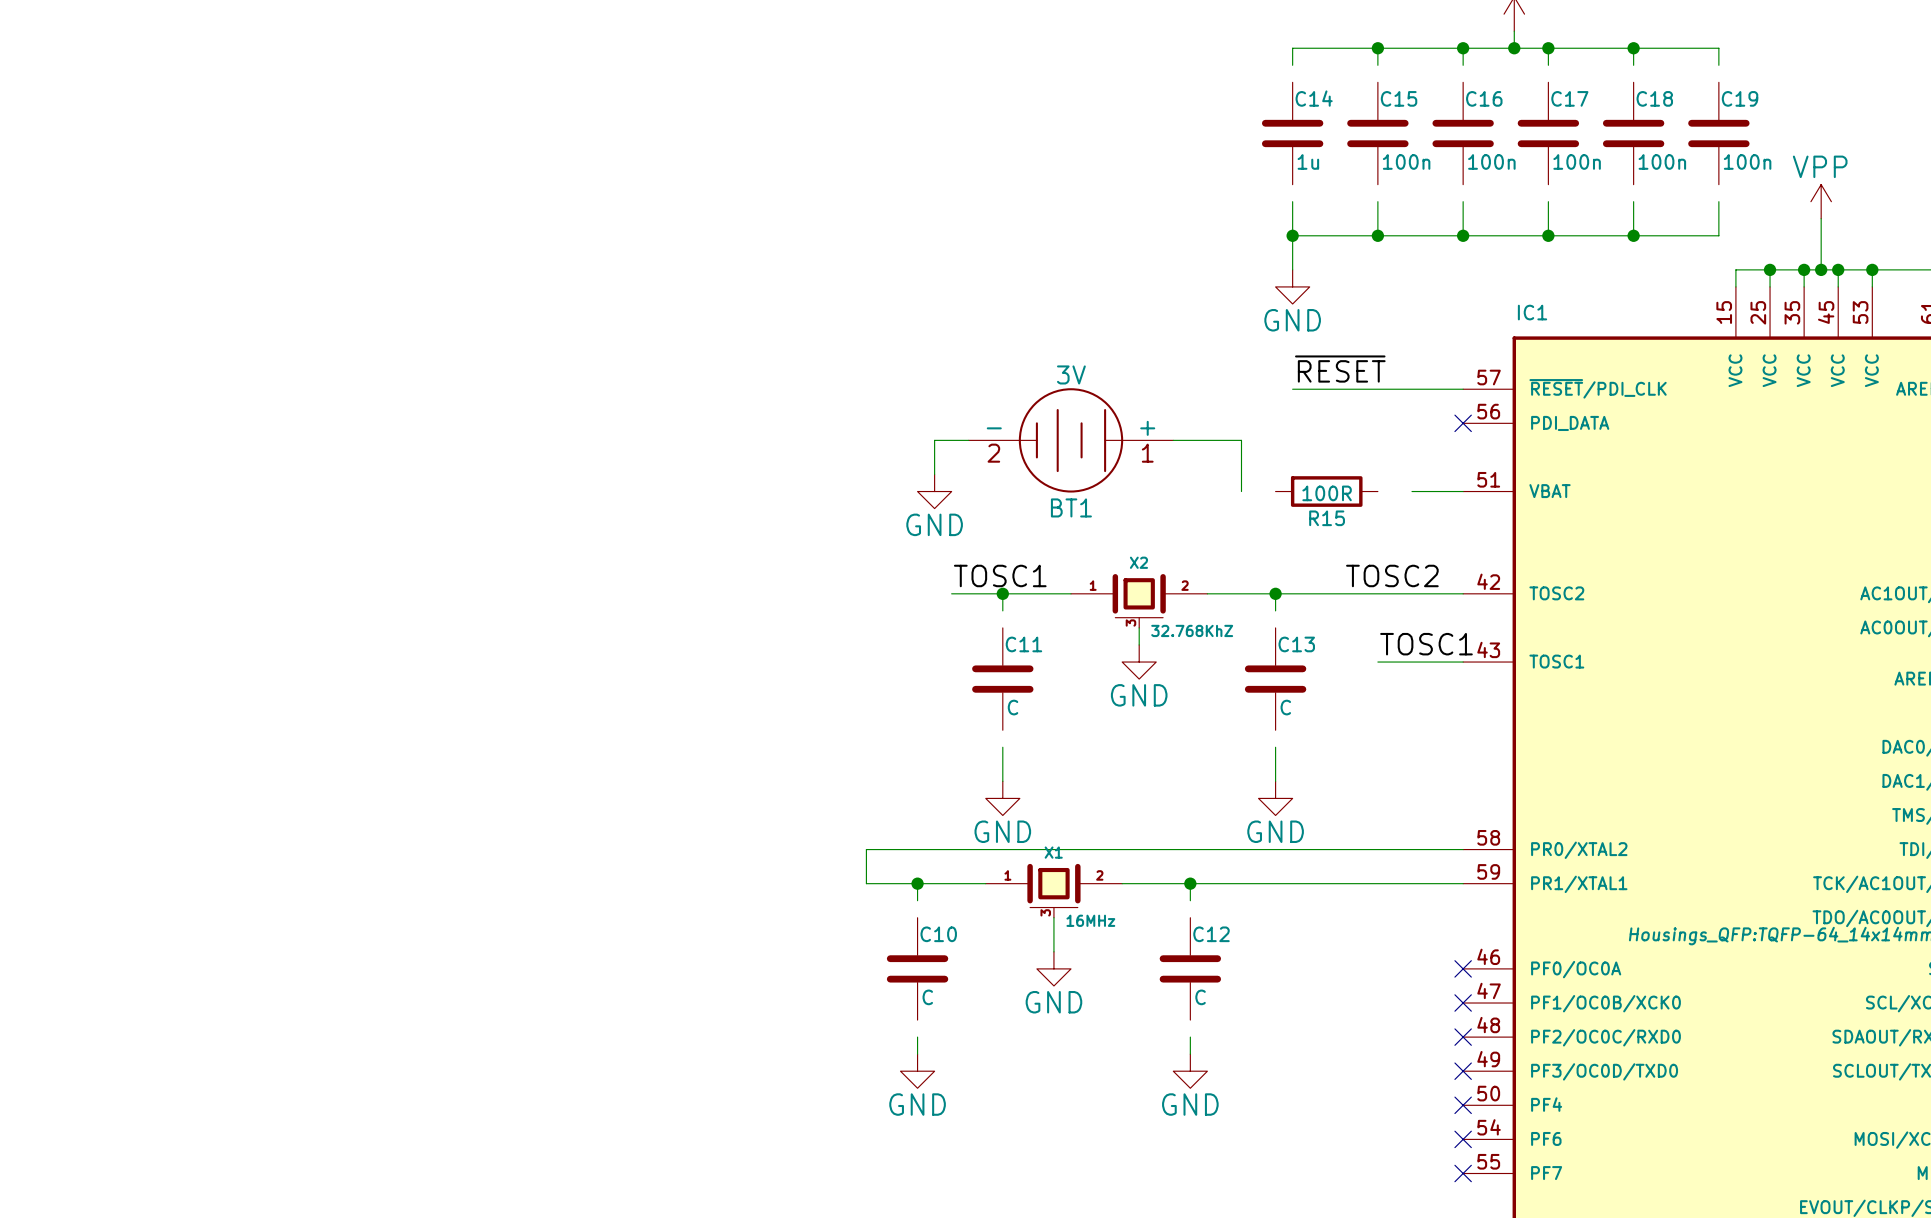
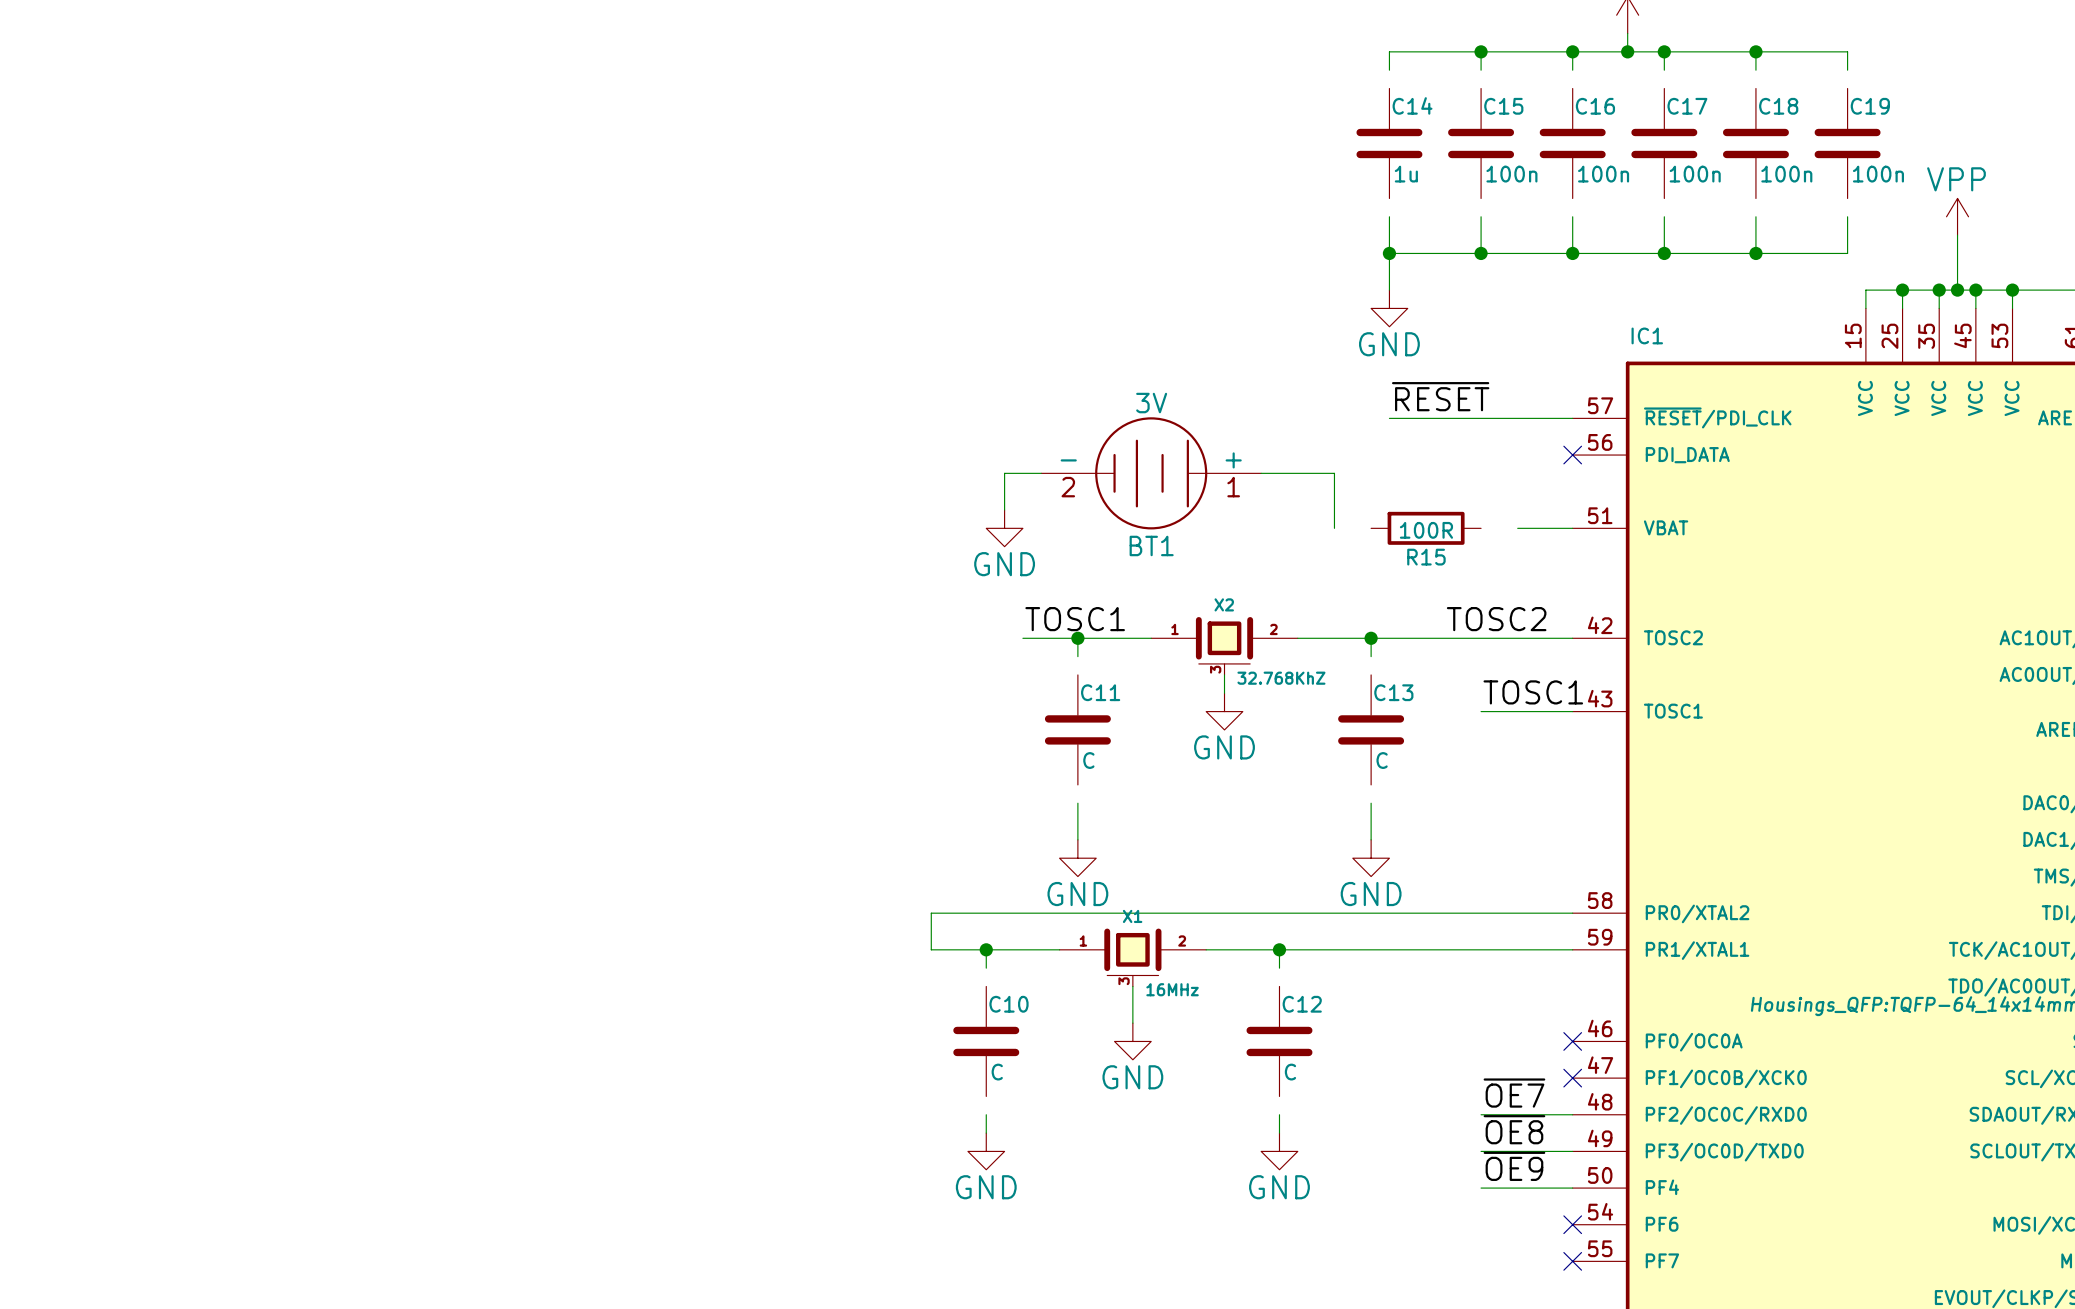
label: none -> ~{OE7} (1514, 1093)
wire: none -> (1481, 1114) (1572, 1114)
no-connect mark: (1463, 1037) -> none
label: none -> ~{OE8} (1514, 1129)
wire: none -> (1481, 1151) (1572, 1151)
no-connect mark: (1463, 1071) -> none
label: none -> ~{OE9} (1514, 1166)
wire: none -> (1481, 1188) (1572, 1188)
no-connect mark: (1463, 1105) -> none

